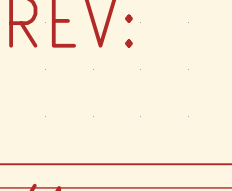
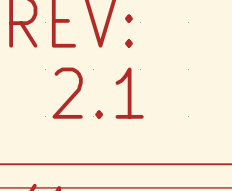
text: none -> 2.1 (98, 93)

